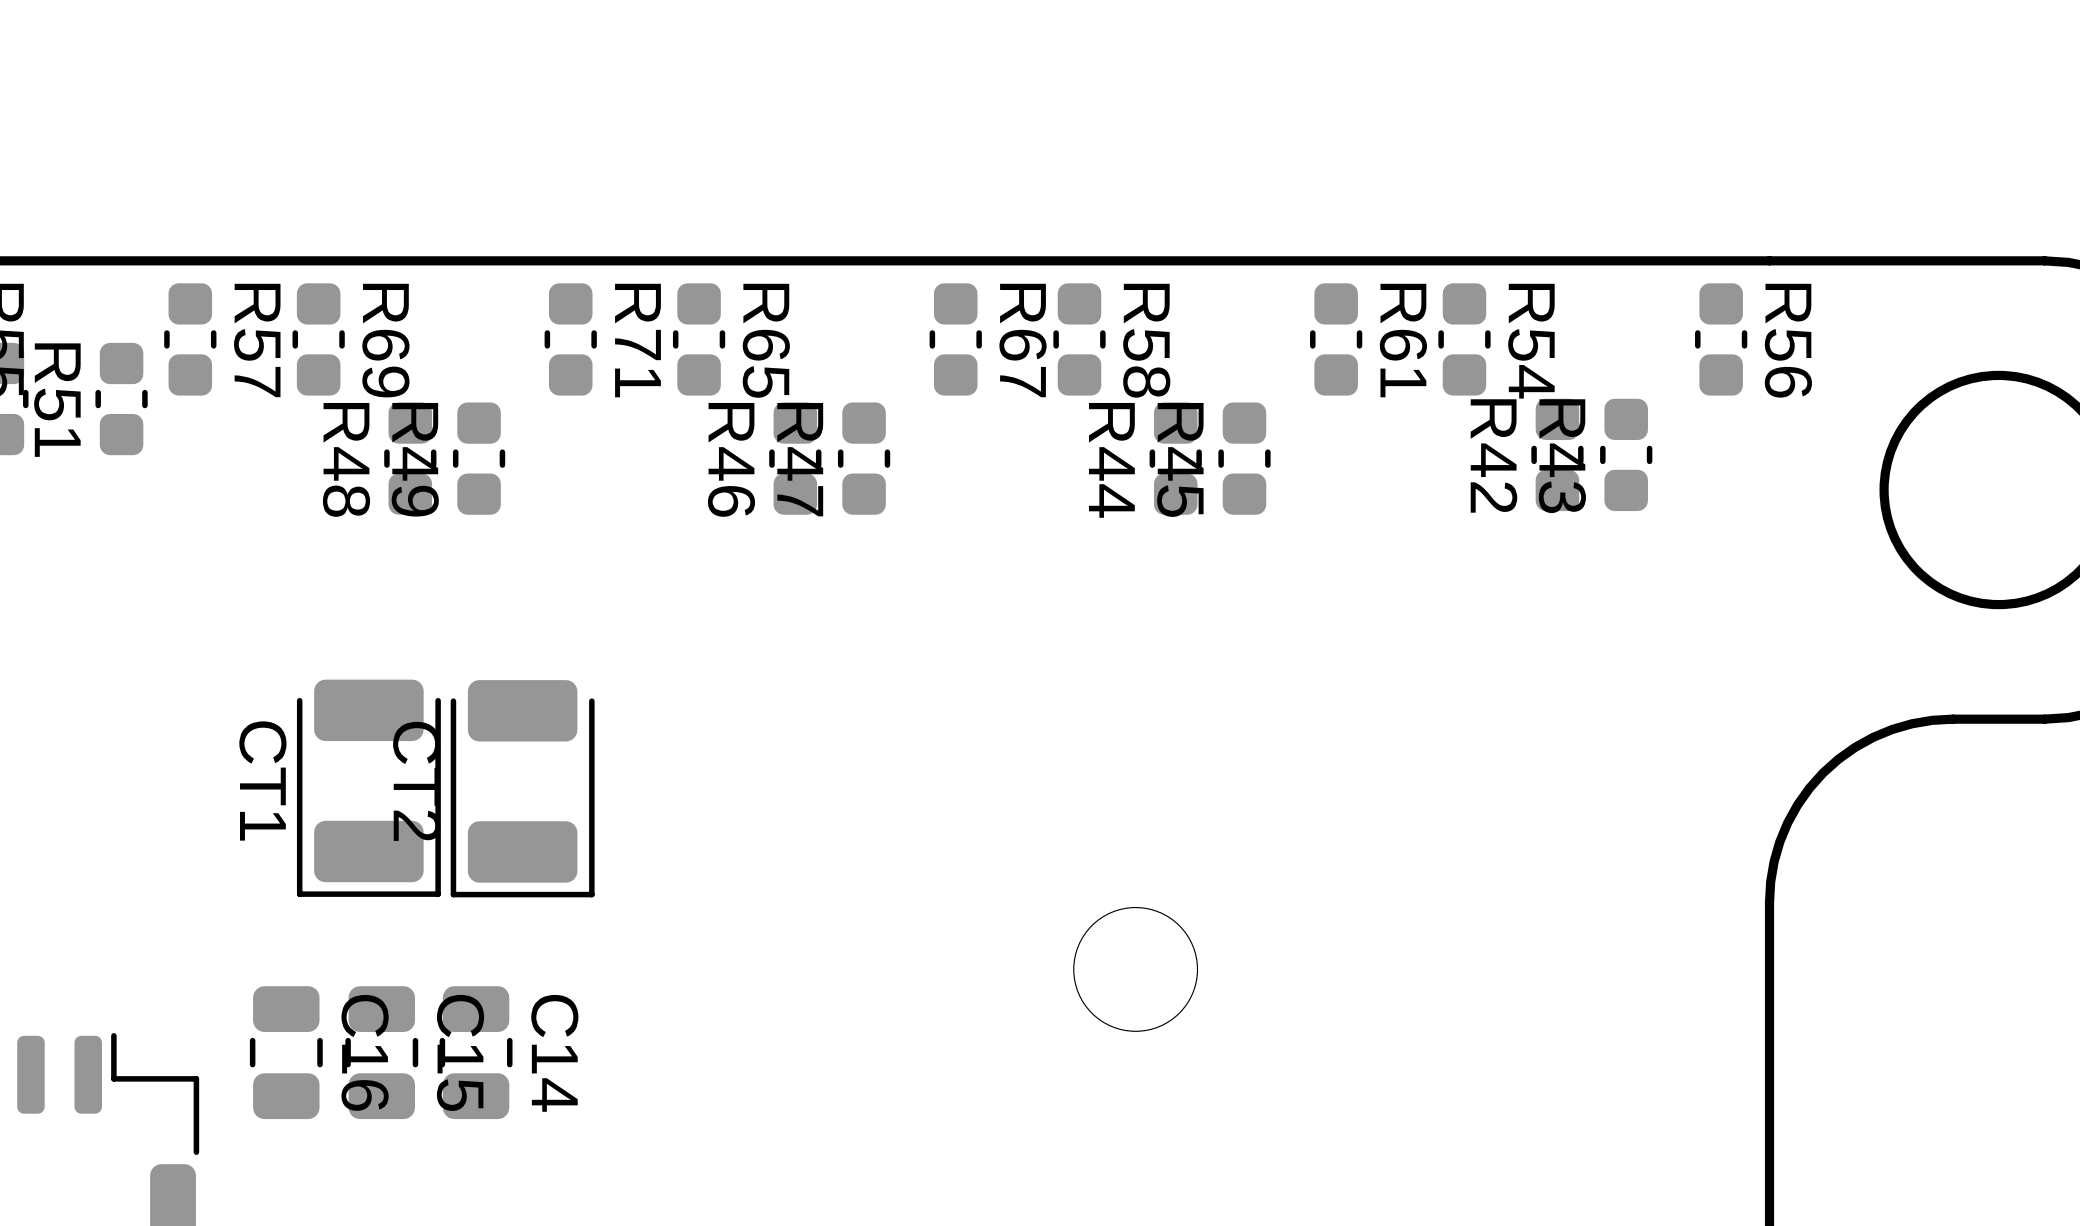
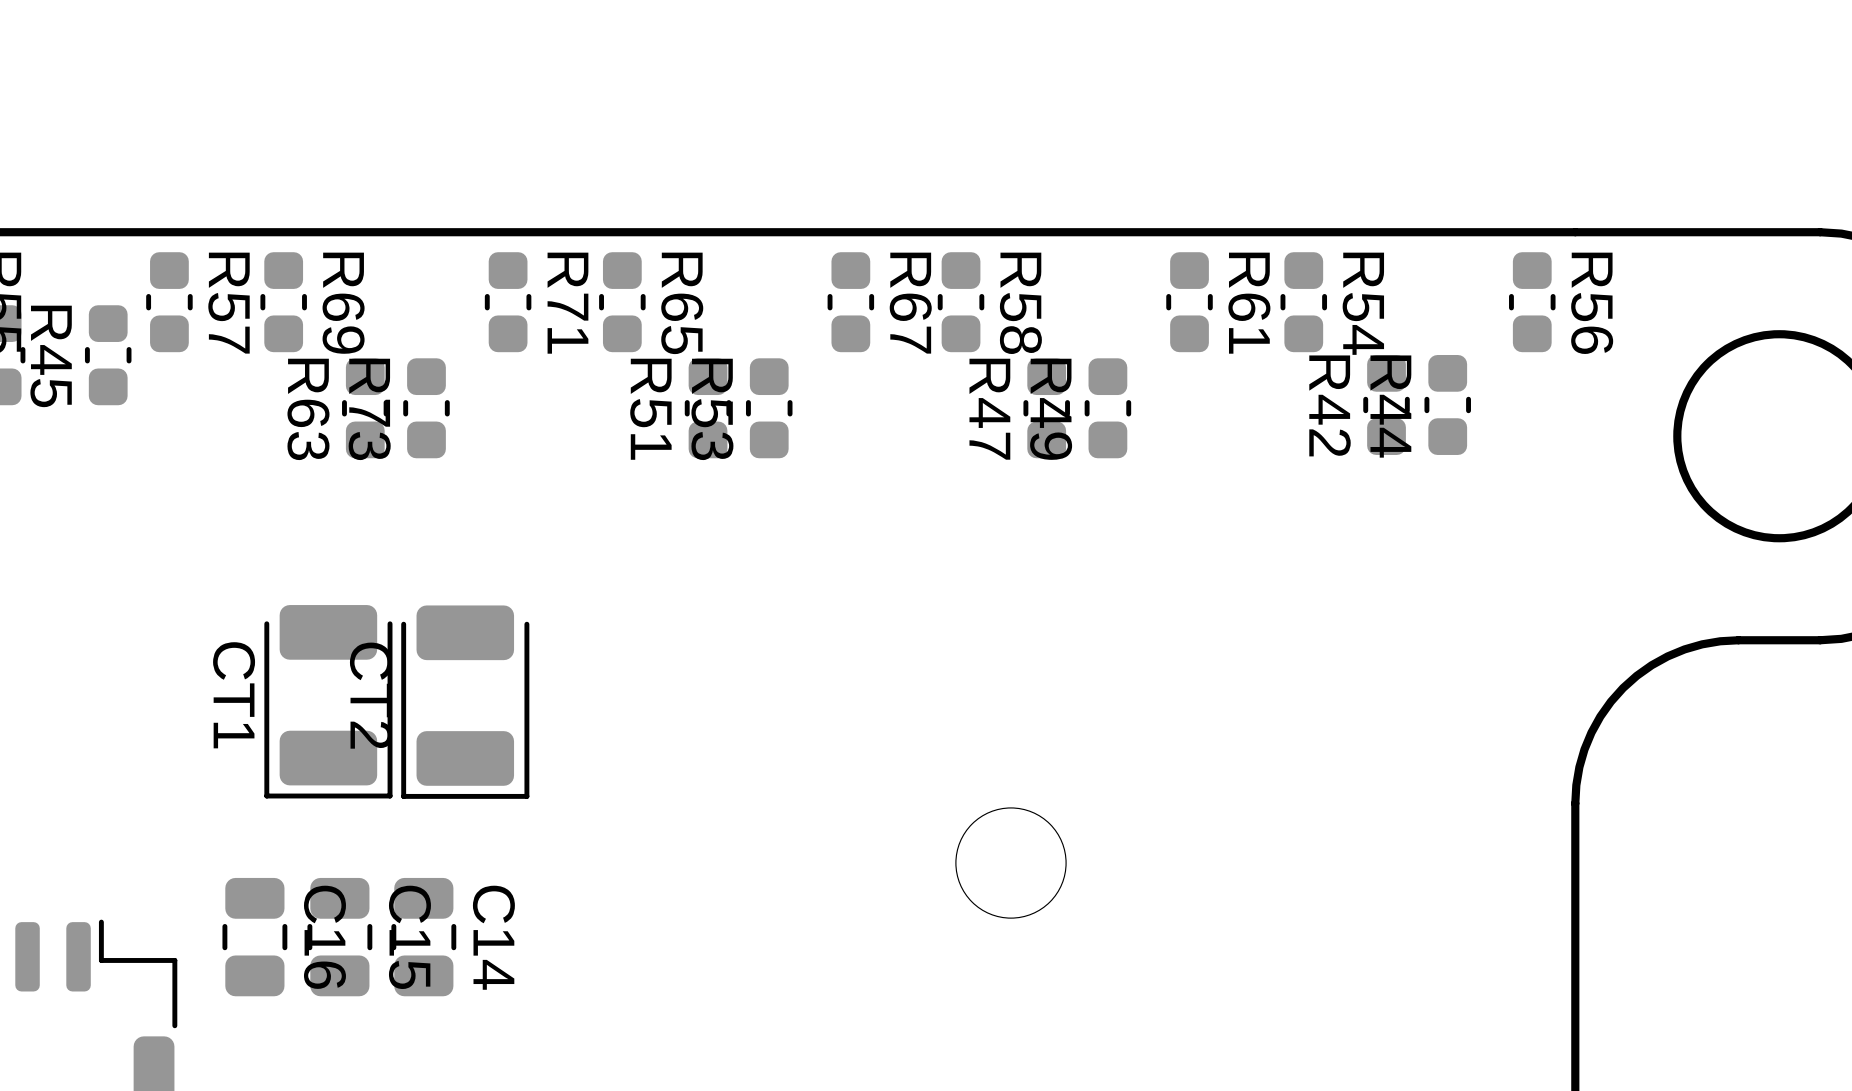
R51 name: R51 (57, 400) -> R45 (51, 356)
R43 name: R43 (1562, 456) -> R44 (1390, 406)
R48 name: R48 (346, 459) -> R63 (308, 409)
R49 name: R49 (415, 459) -> R73 (369, 409)
R46 name: R46 (731, 459) -> R51 (650, 409)
R47 name: R47 (800, 459) -> R53 (712, 409)
R45 name: R45 (1180, 459) -> R49 (1051, 409)
R44 name: R44 (1111, 460) -> R47 (989, 409)

